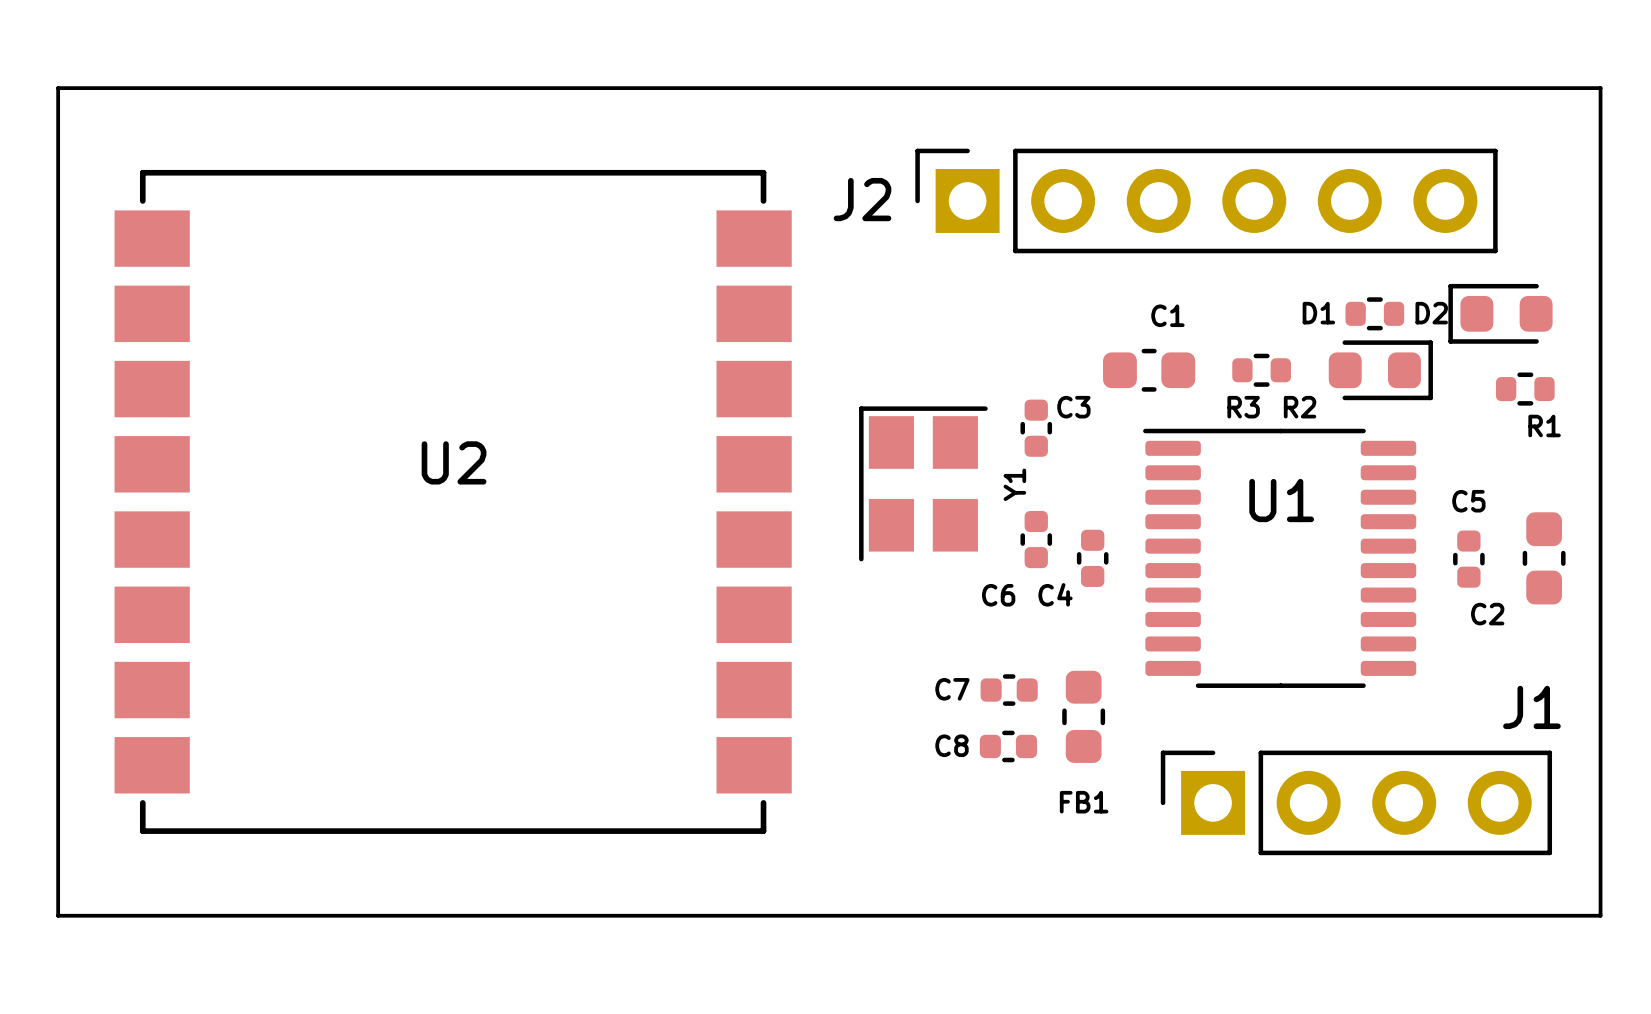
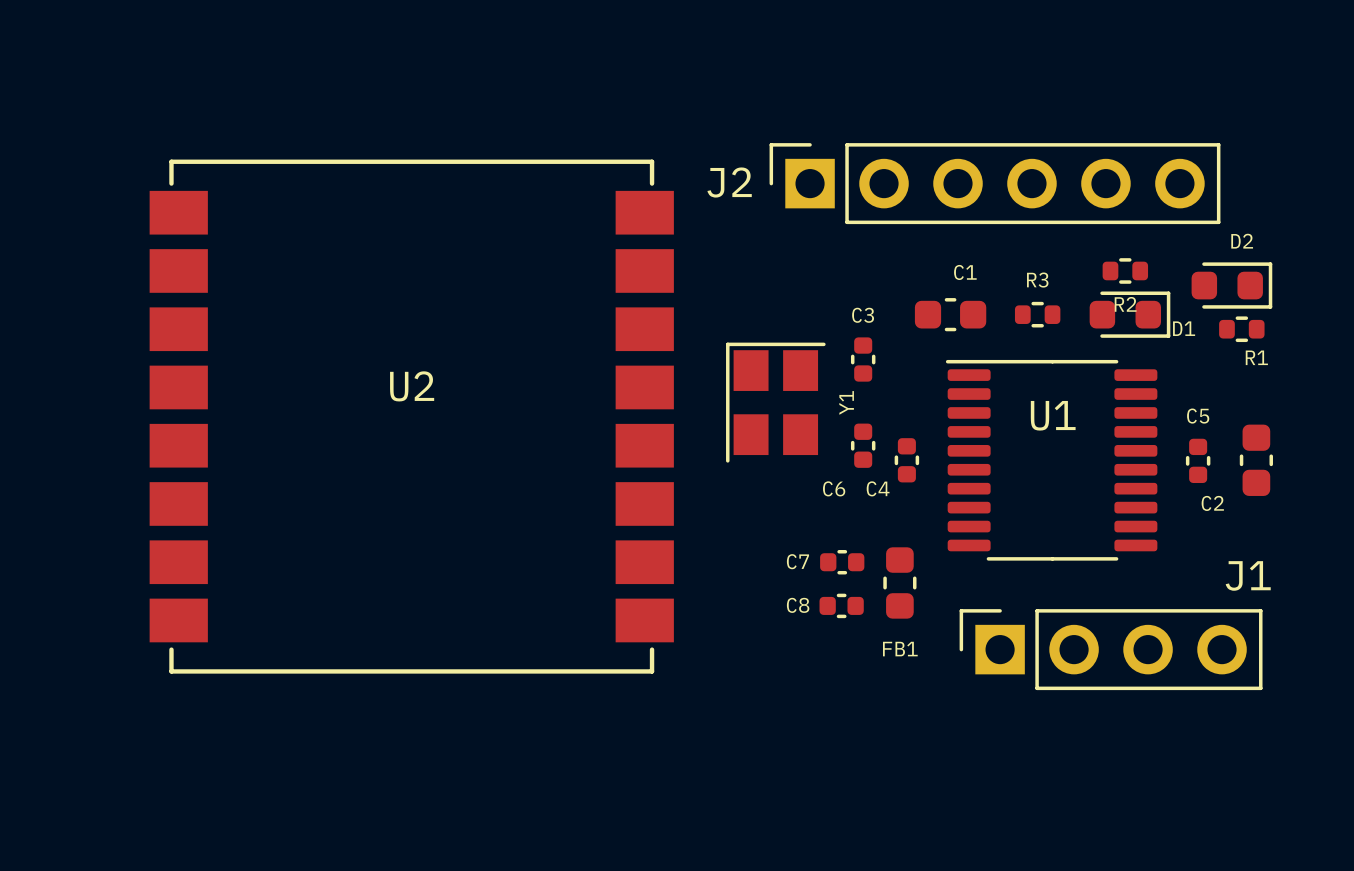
board edge: (58, 88) (1600, 88) (1600, 915) (58, 915) (58, 88) -> none
D1 name position: D1 (1318, 313) -> D1 (1184, 328)
D2 name position: D2 (1431, 313) -> D2 (1242, 241)
D2 rotation: 0° (1500, 313) -> 180° (1231, 285)
C3 name position: C3 (1073, 407) -> C3 (863, 315)
R3 name position: R3 (1243, 407) -> R3 (1037, 280)
R2 name position: R2 (1300, 407) -> R2 (1125, 304)

